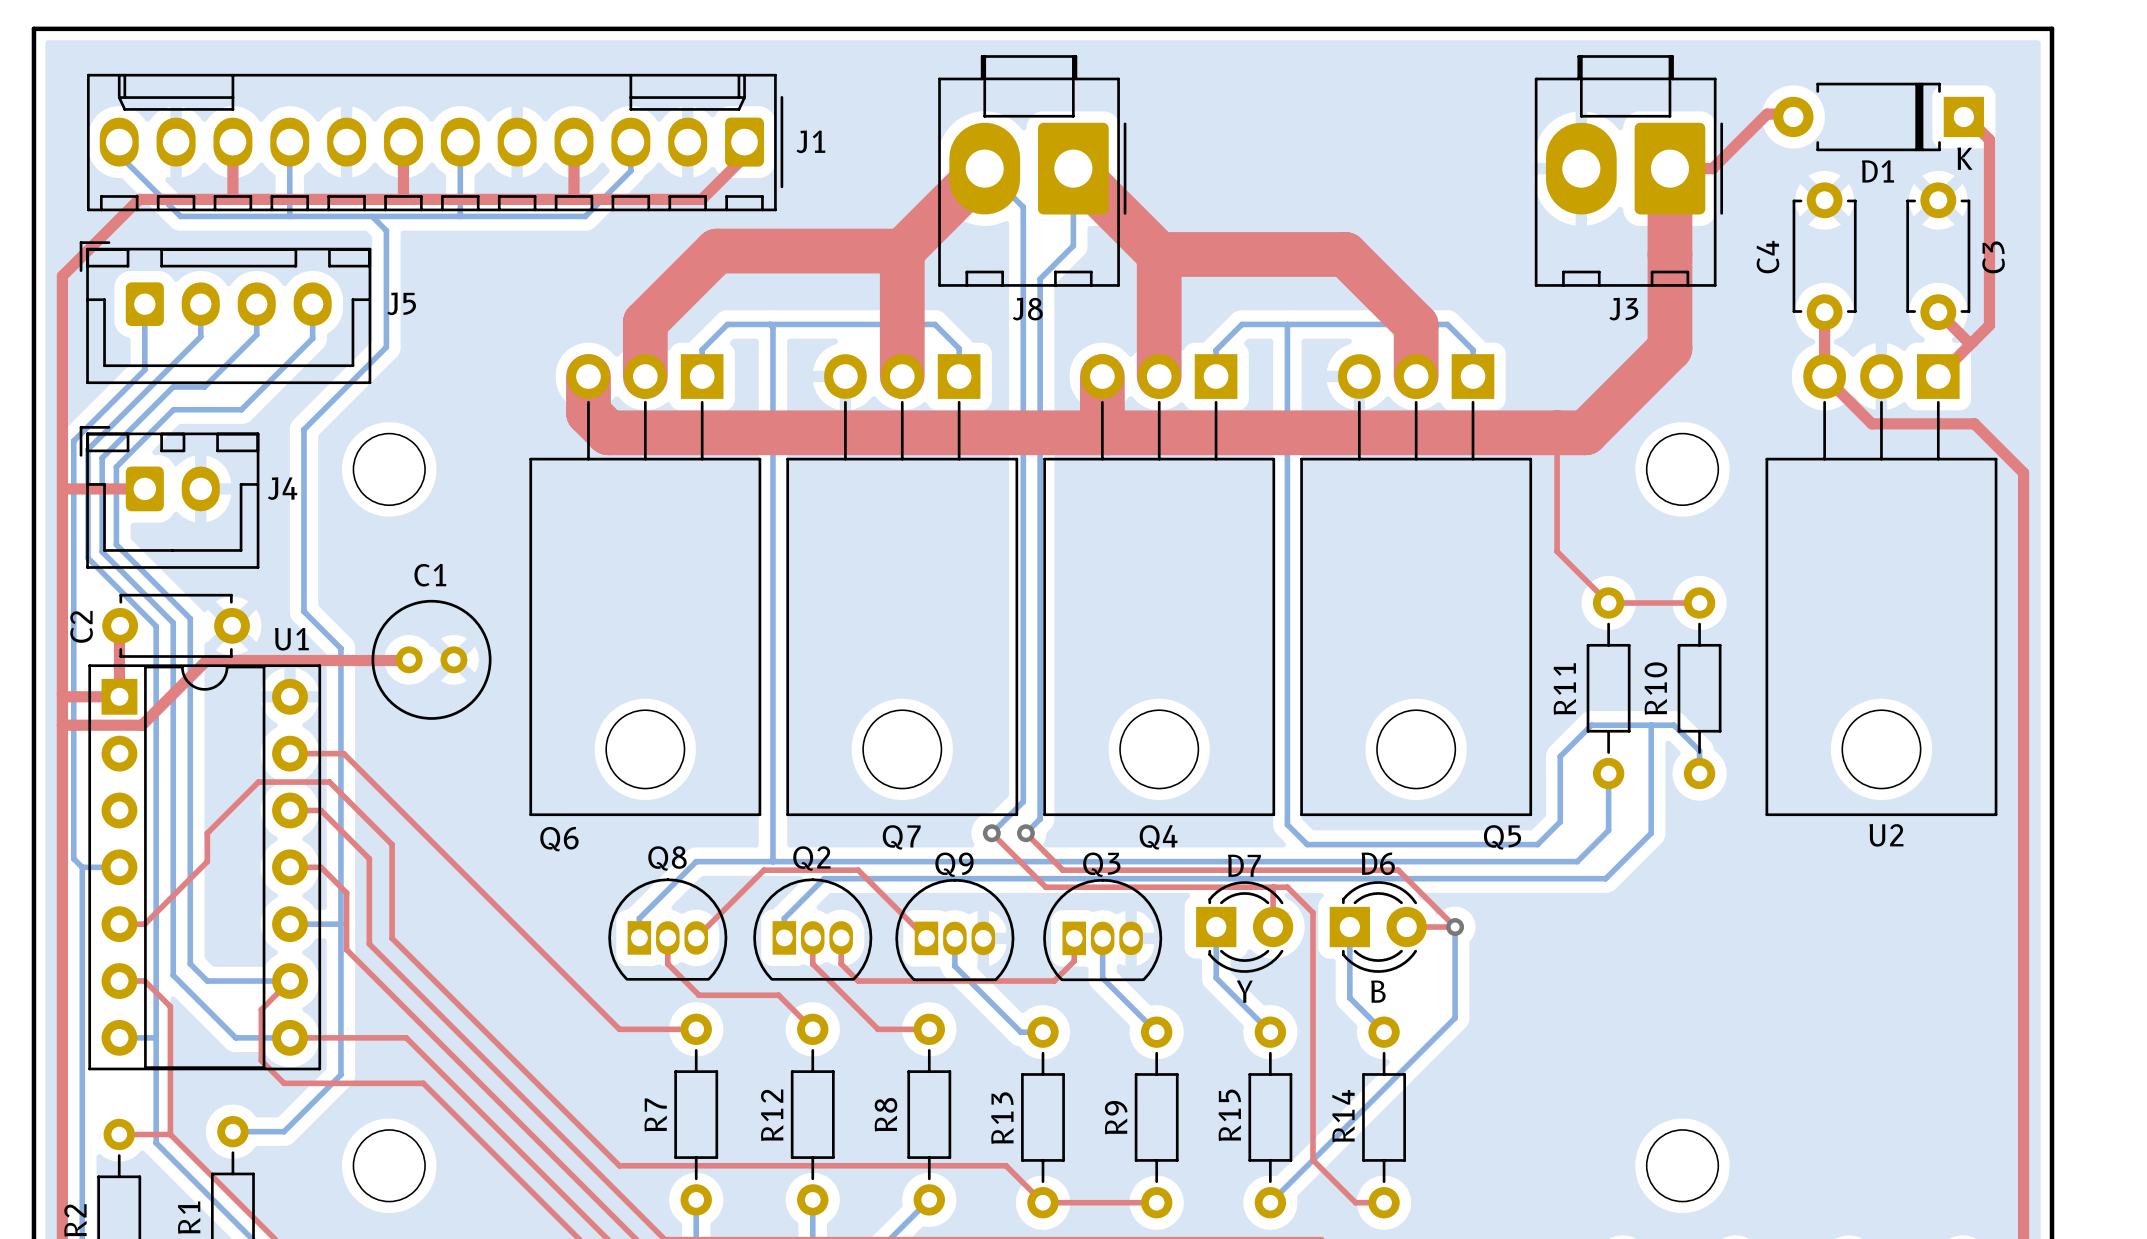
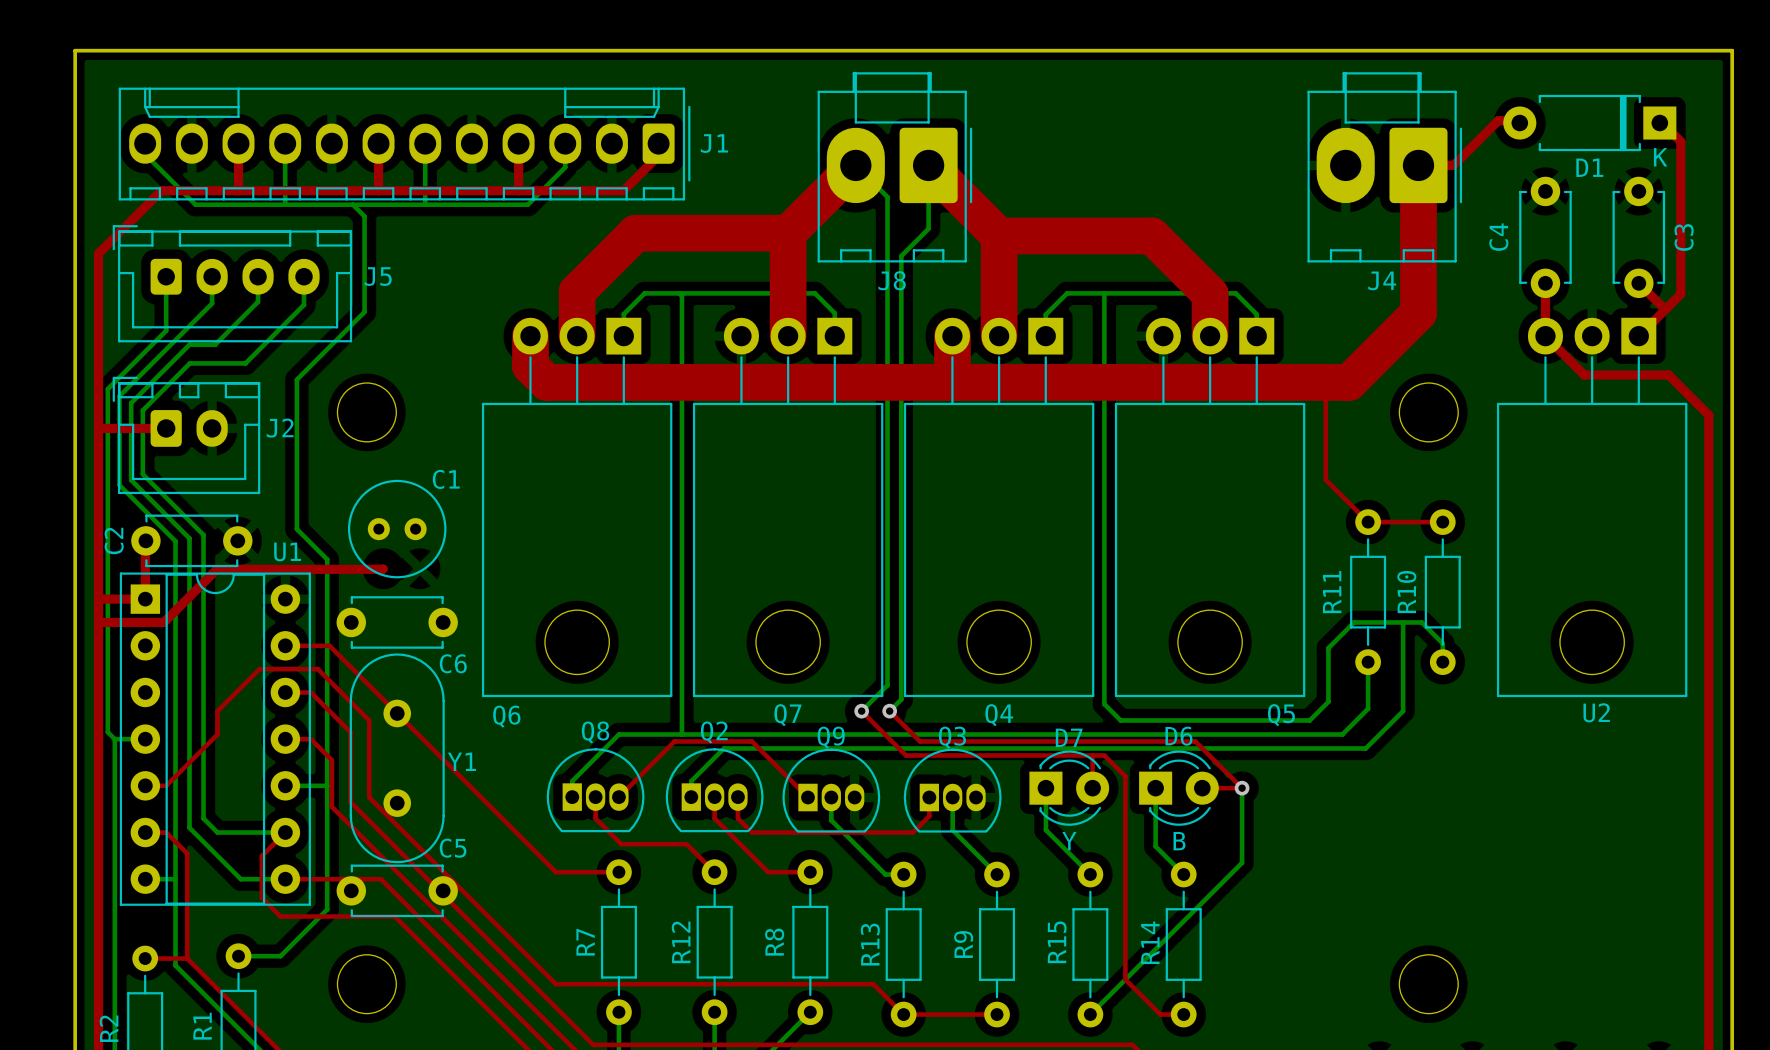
J3 name: J3 (1623, 309) -> J4 (1382, 280)
J4 name: J4 (282, 488) -> J2 (280, 428)
C1 name position: C1 (430, 575) -> C1 (446, 479)
C1 position: (431, 659) -> (397, 529)
C6: none -> (397, 622)
Y1: none -> (397, 758)
C5: none -> (397, 890)

